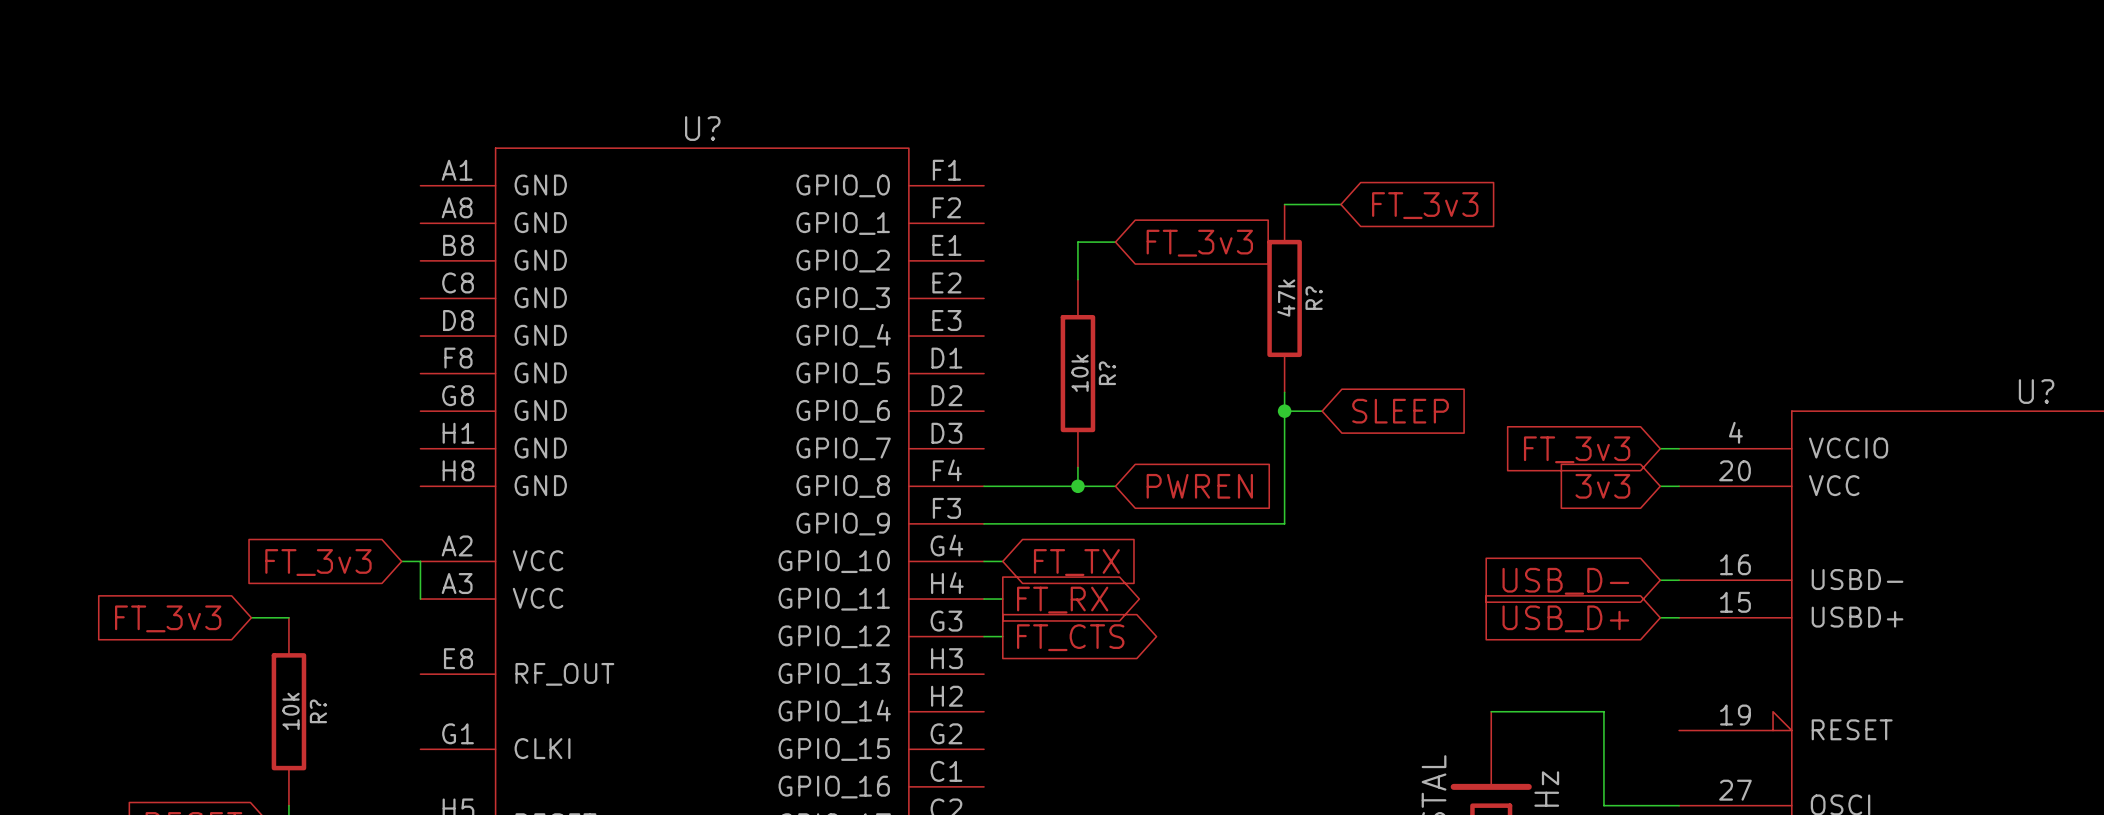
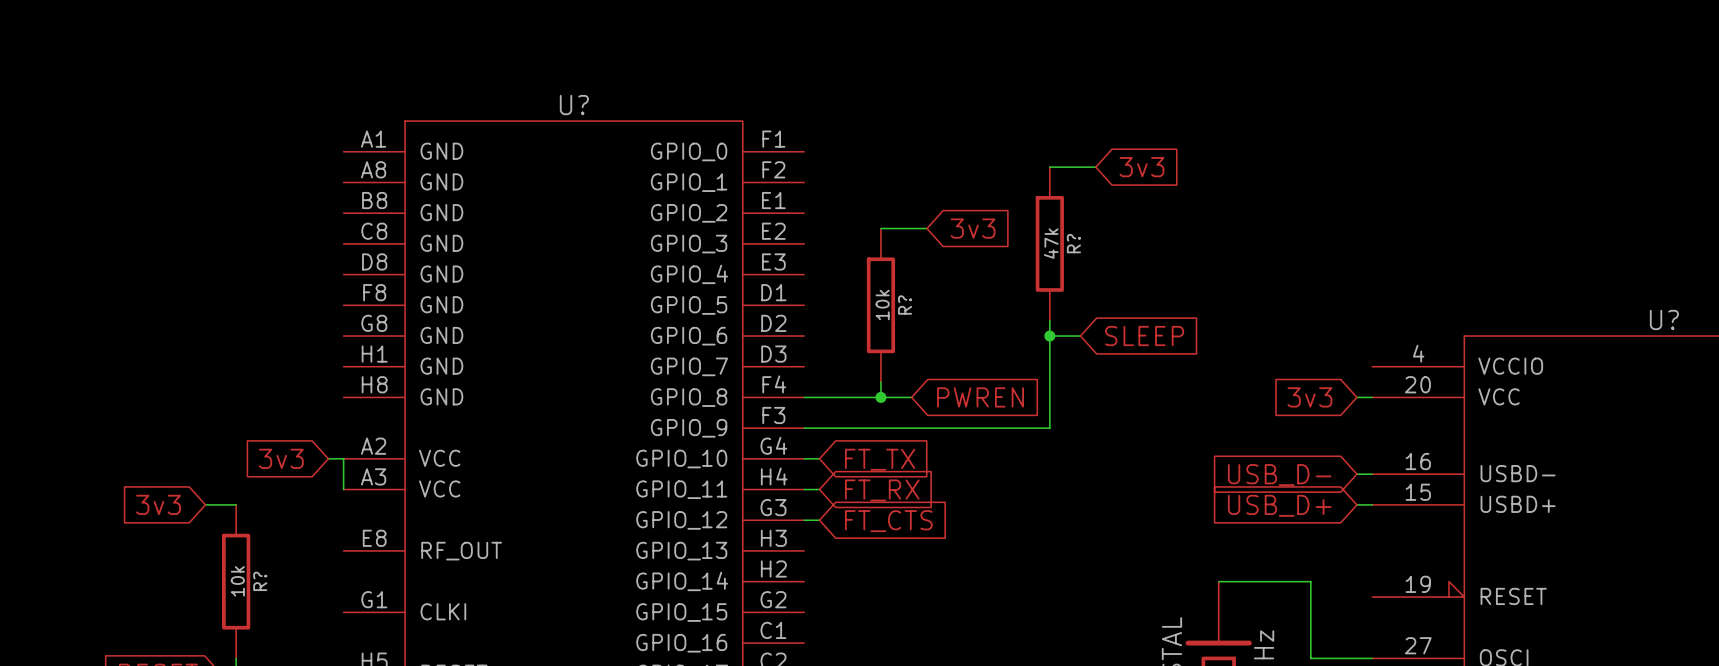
global label: FT_3v3 (1425, 205) -> 3v3 (1141, 167)
wire: (1115, 242) (1077, 242) (1077, 279) -> (927, 228) (880, 228)
global label: FT_3v3 (1199, 243) -> 3v3 (973, 228)
wire: (1660, 448) (1679, 448) -> none
global label: FT_3v3 (1577, 449) -> none
global label: FT_3v3 (318, 562) -> 3v3 (281, 458)
global label shape: output (1062, 600) -> input (882, 490)
global label: FT_3v3 (168, 618) -> 3v3 (158, 504)
global label shape: output (1070, 637) -> input (888, 521)

